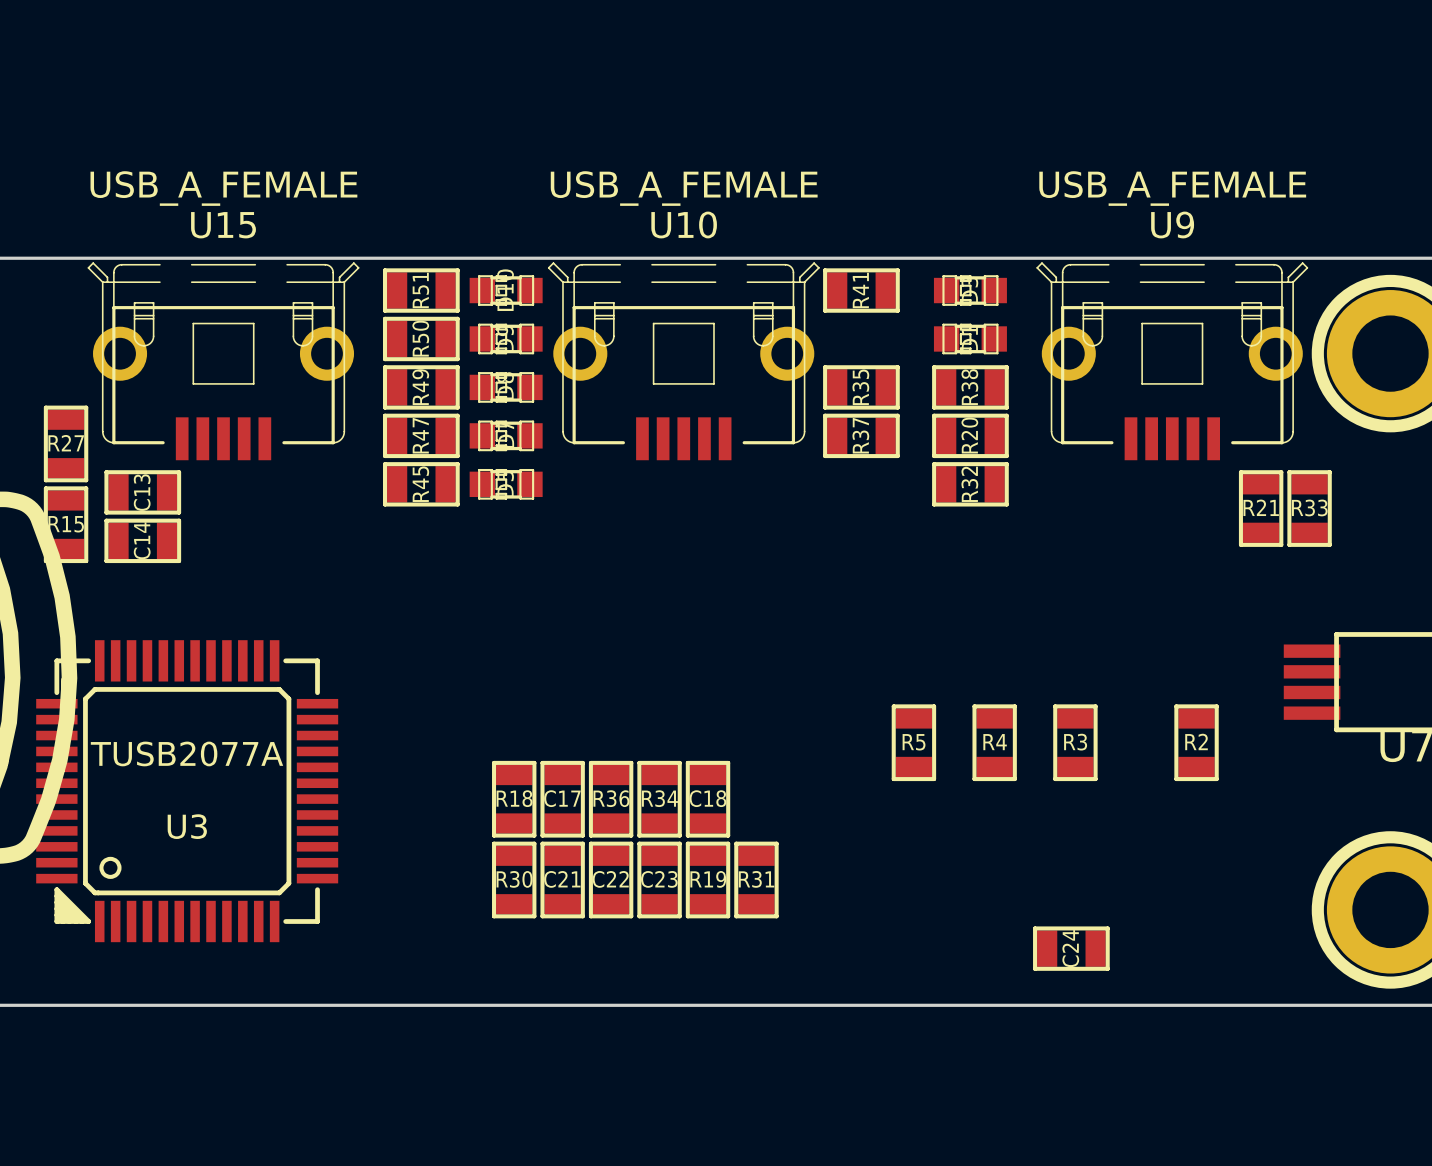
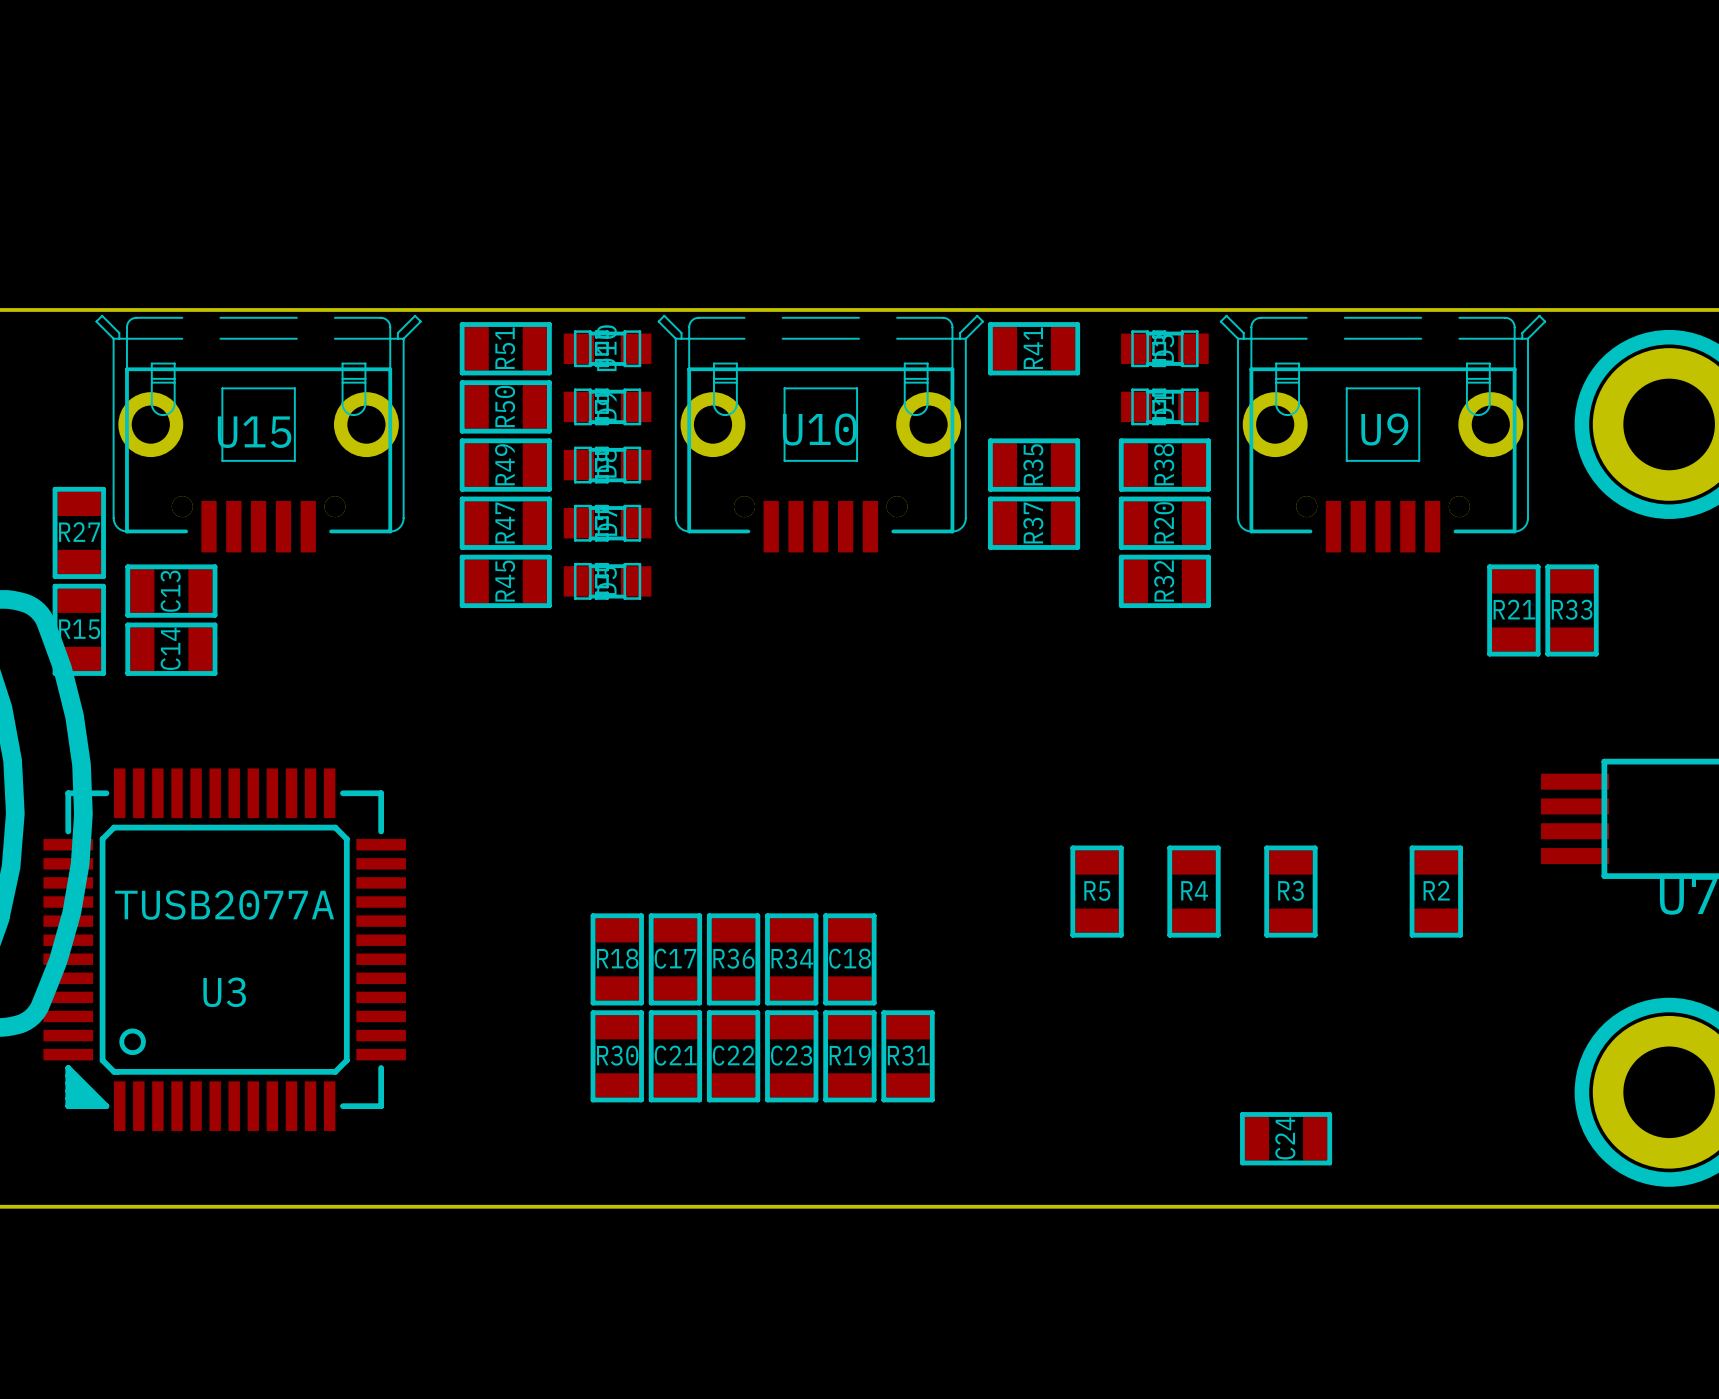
U15 value: USB_A_FEMALE (223, 188) -> none
U10 value: USB_A_FEMALE (684, 188) -> none
U9 value: USB_A_FEMALE (1172, 188) -> none
U10 name position: U10 (684, 224) -> U10 (819, 429)
U9 name position: U9 (1172, 224) -> U9 (1384, 429)
U15 name position: U15 (223, 225) -> U15 (254, 432)
U15 footprint: [87, 262, 360, 461] -> [95, 314, 422, 553]
U10 footprint: [547, 262, 820, 461] -> [657, 314, 984, 553]
U9 footprint: [1036, 262, 1309, 461] -> [1219, 314, 1547, 553]

